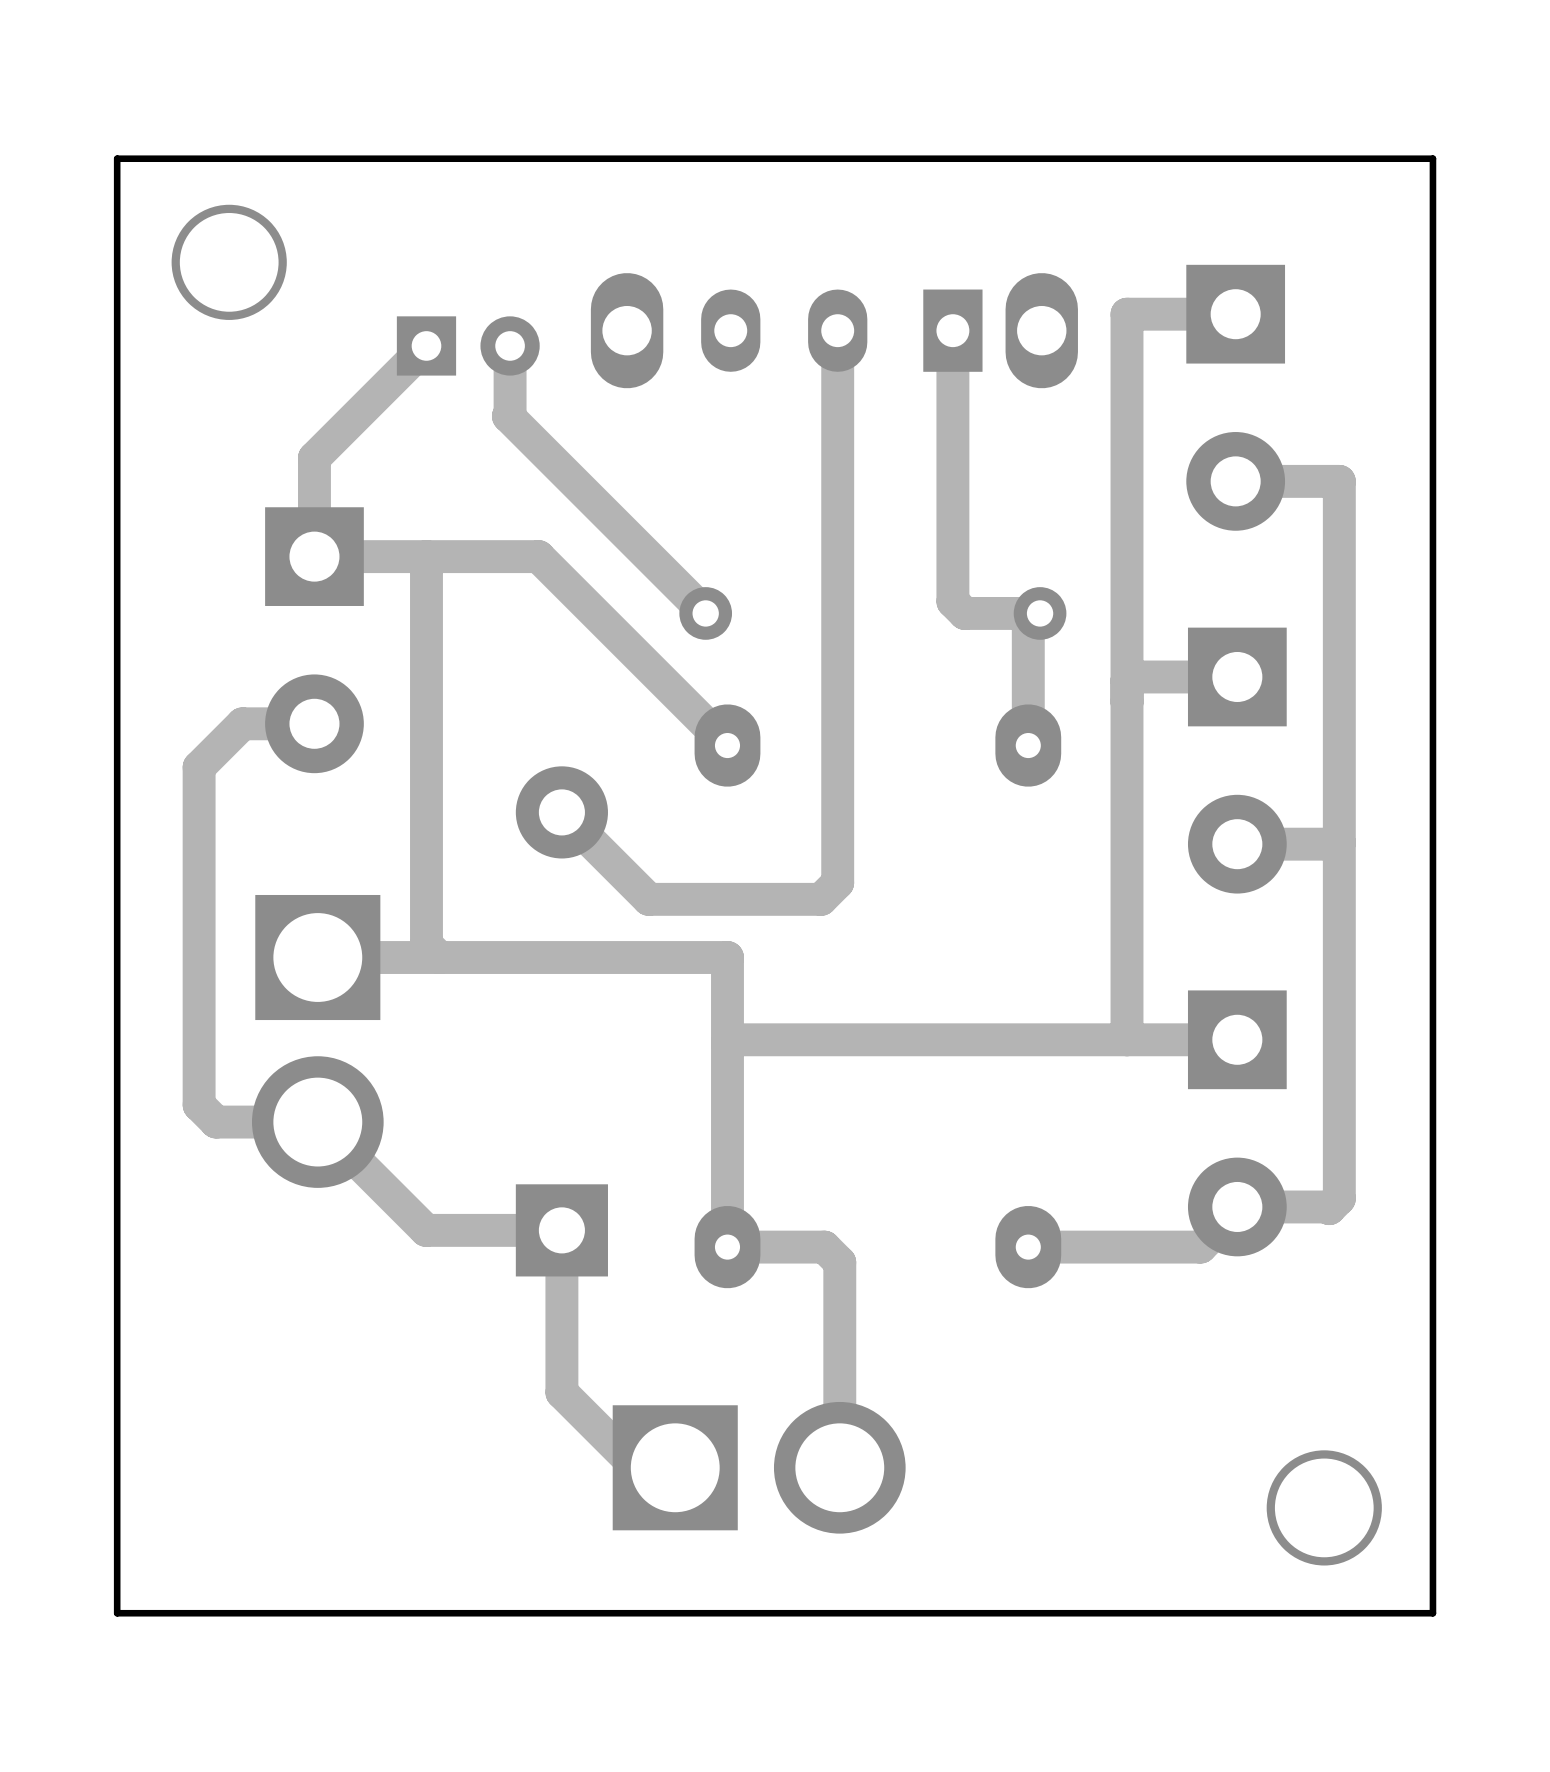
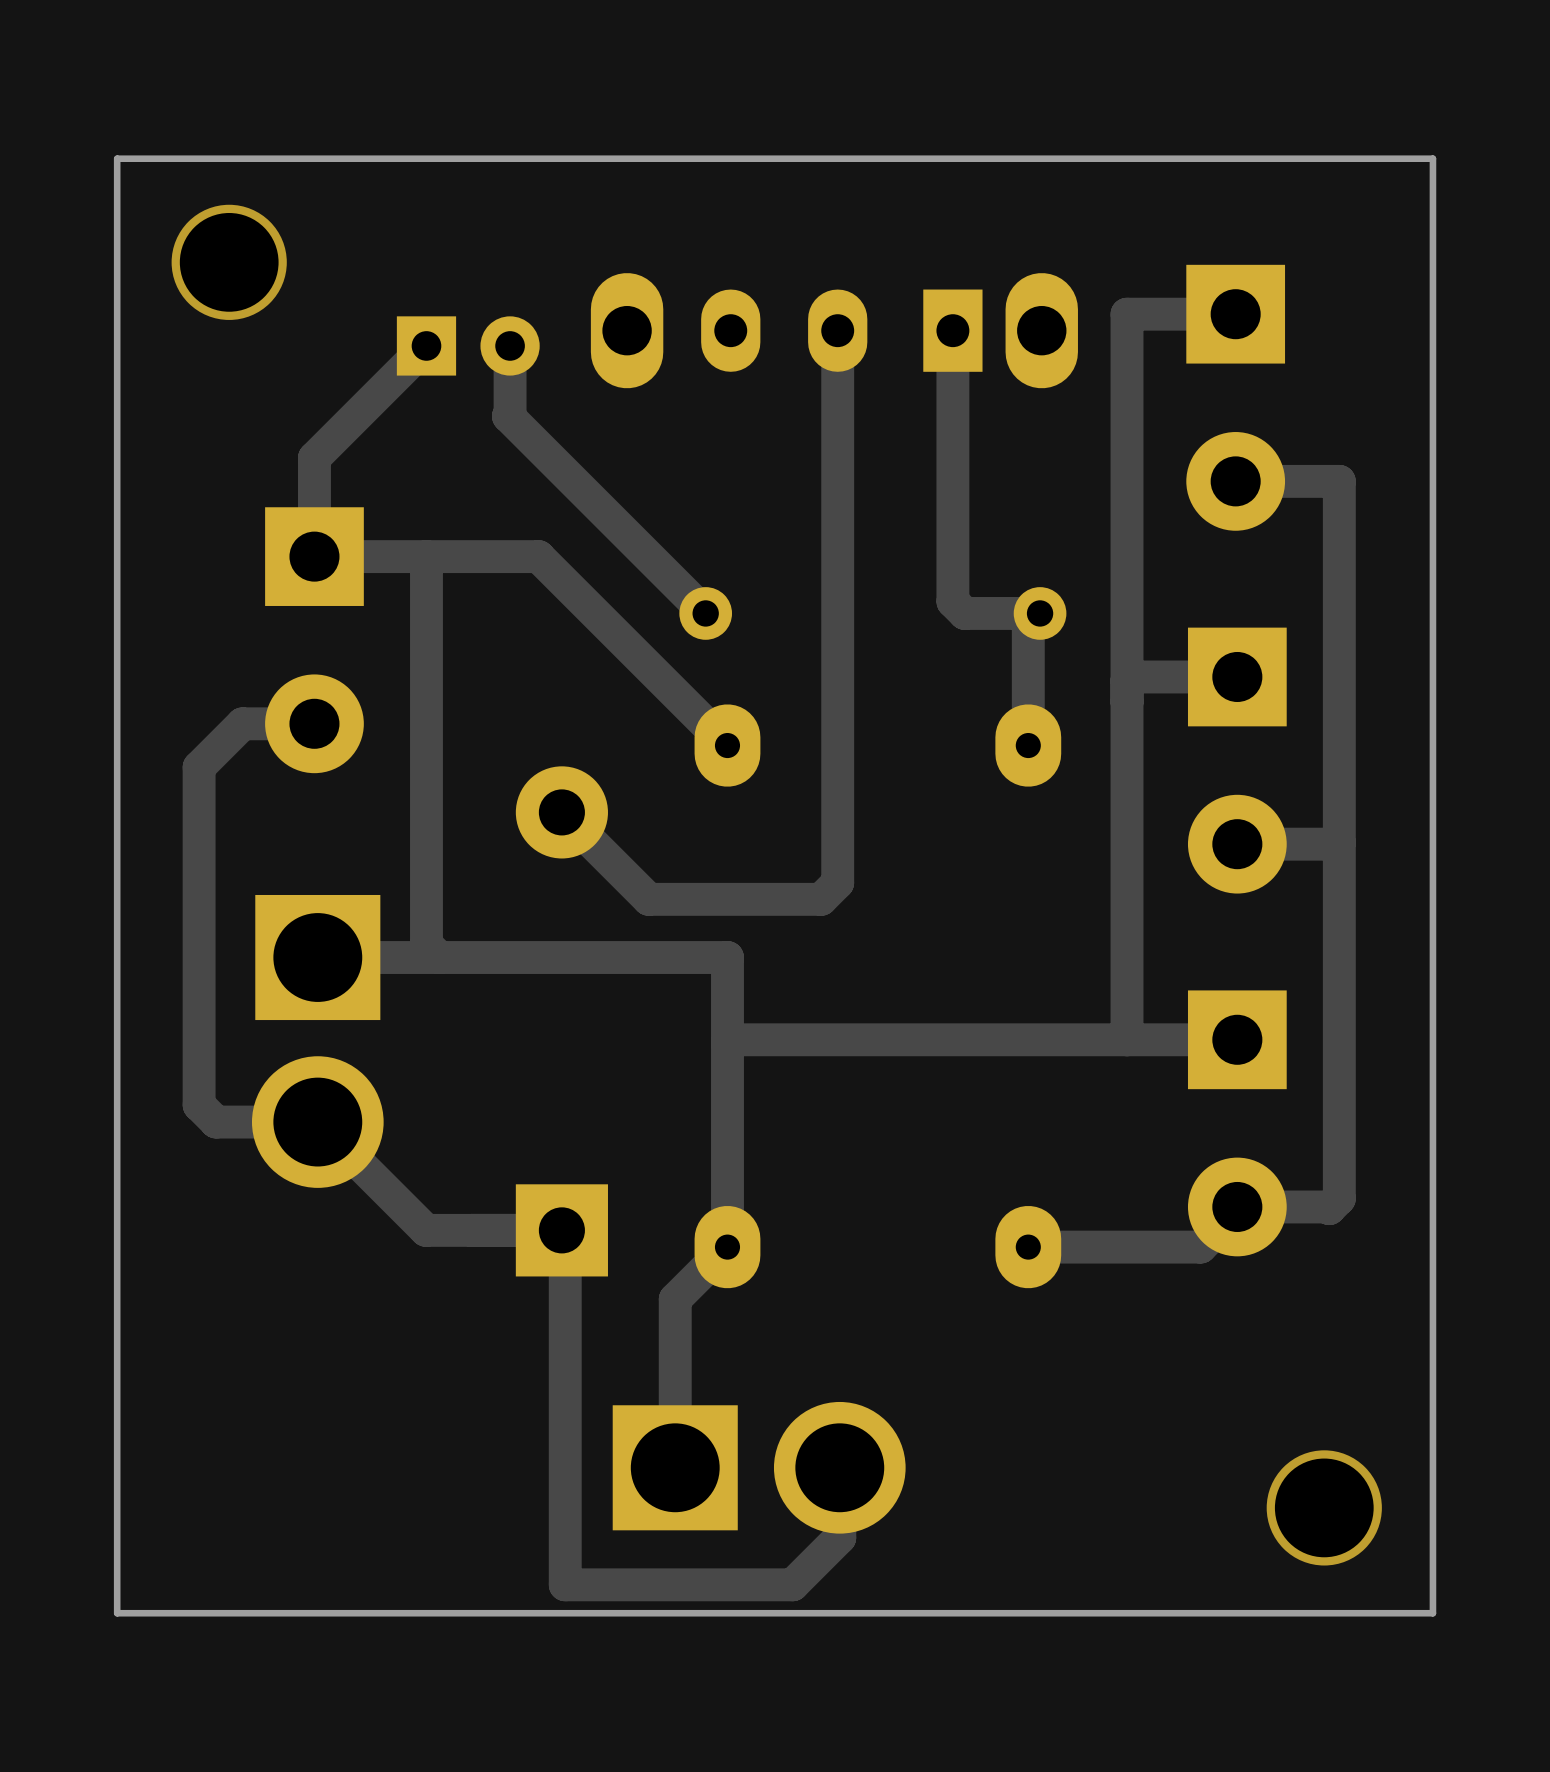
track: (561, 1230) (561, 1392) (638, 1469) -> (561, 1230) (565, 1230) (565, 1584) (792, 1584) (839, 1537) (839, 1469)
track: (727, 1247) (824, 1247) (839, 1262) (839, 1467) -> (727, 1247) (675, 1299) (675, 1467)

